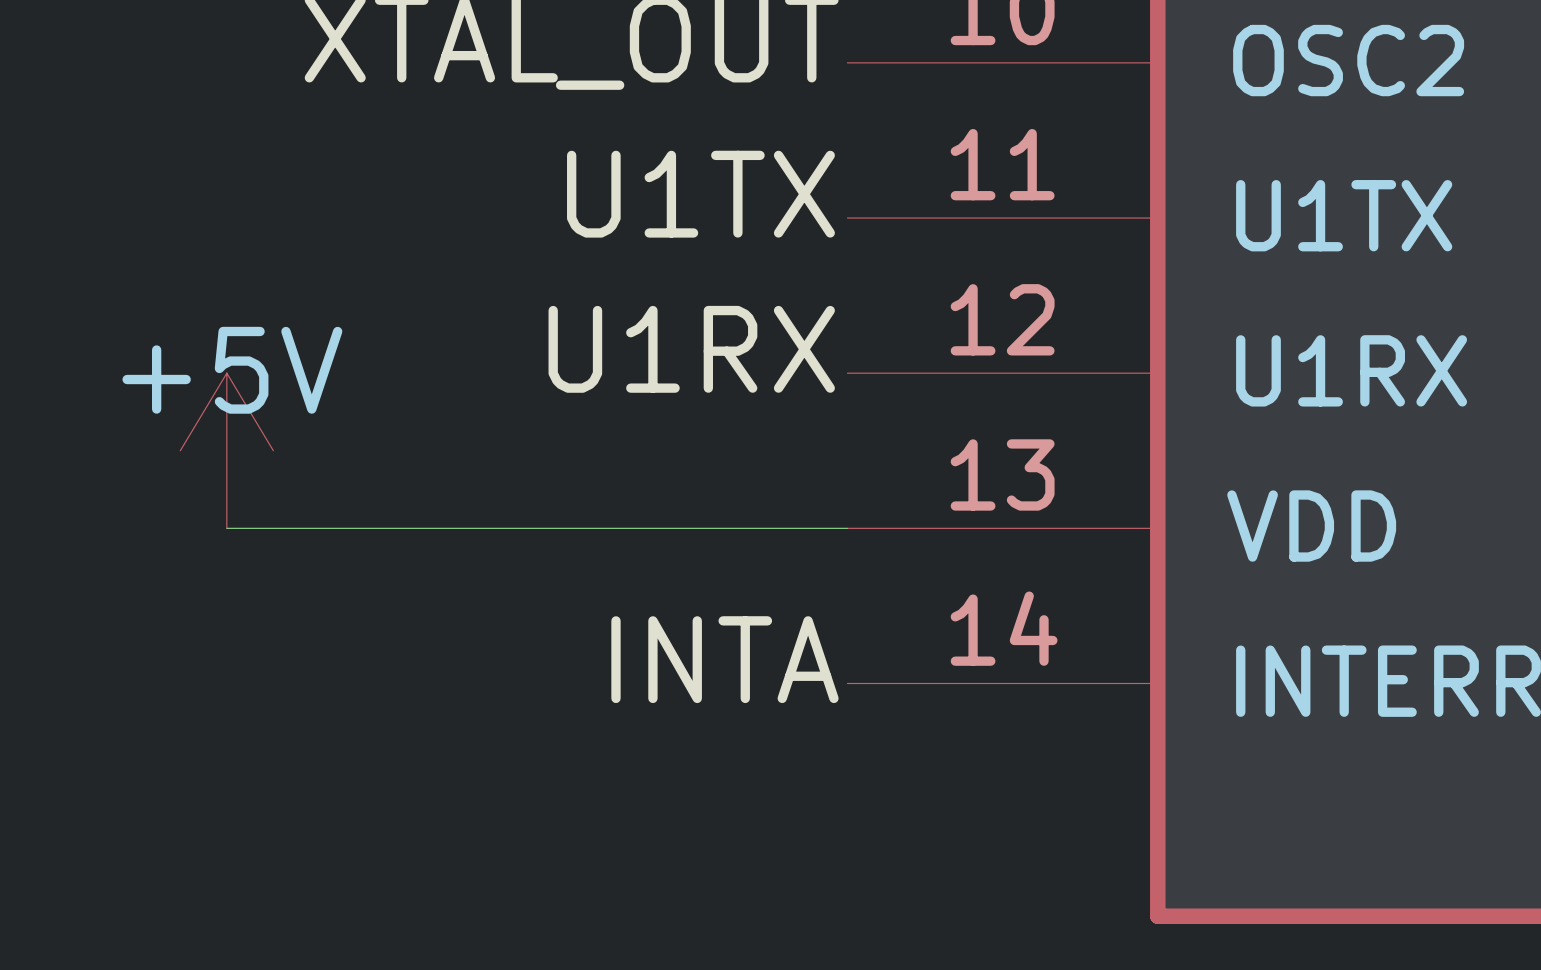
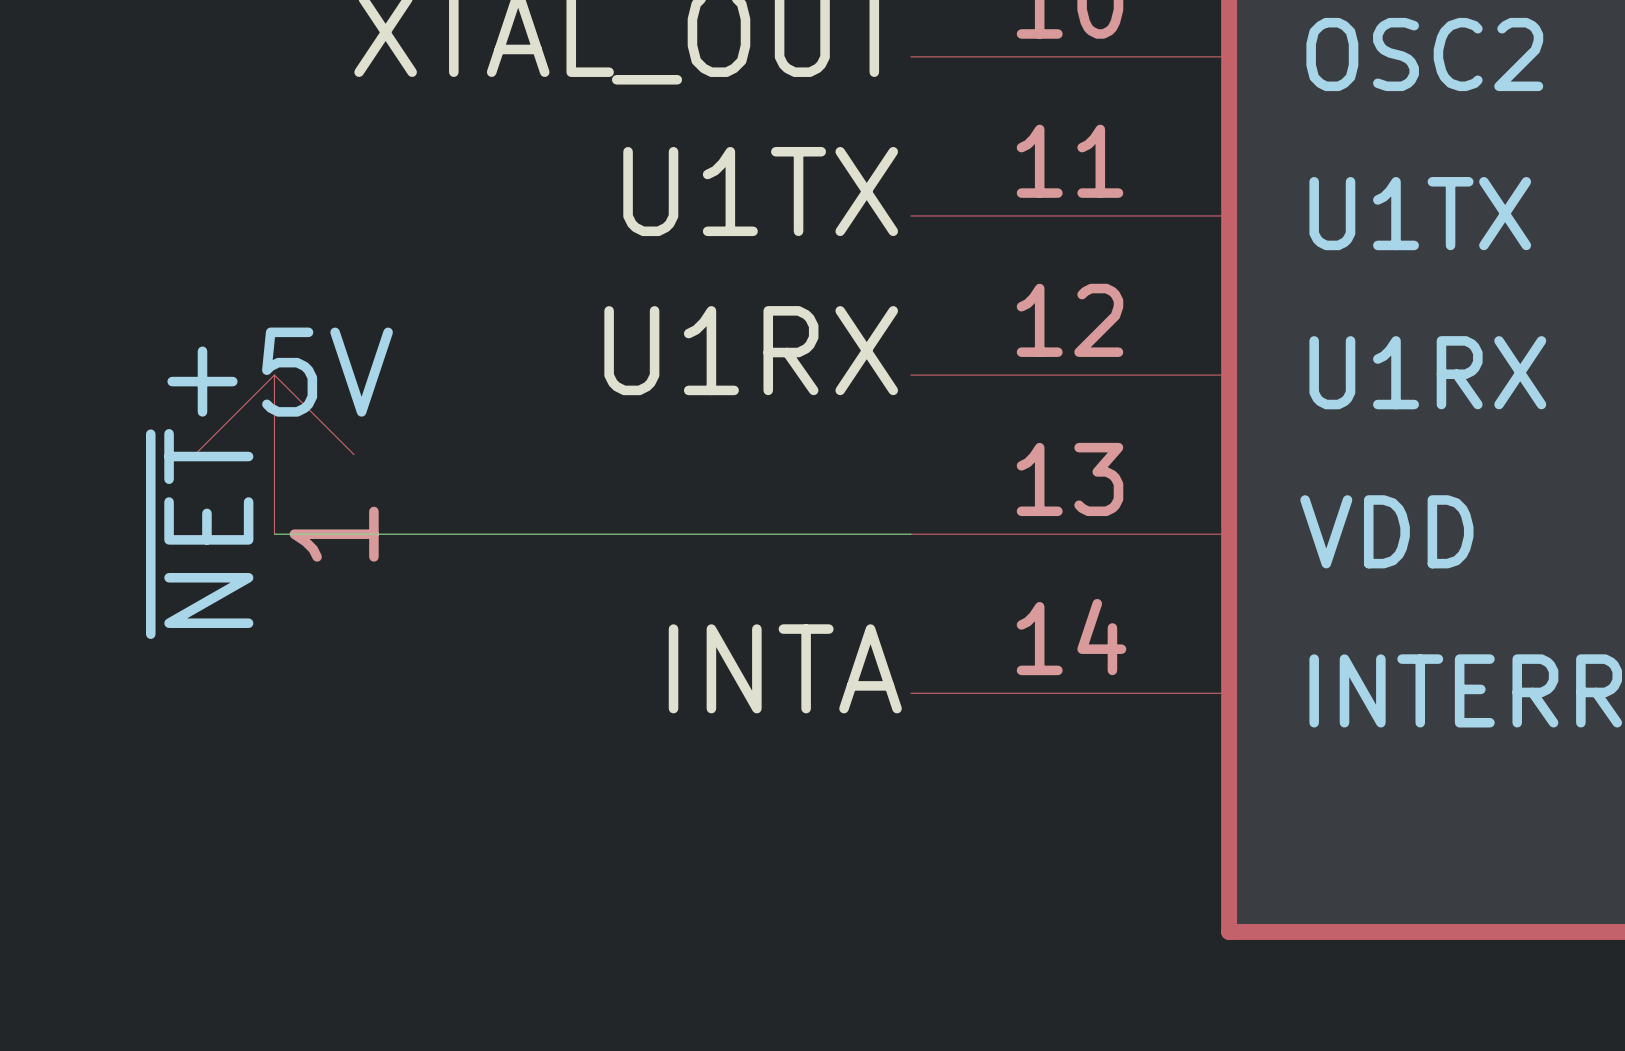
power symbol shape: [180, 373, 274, 529] -> [194, 375, 355, 535]

